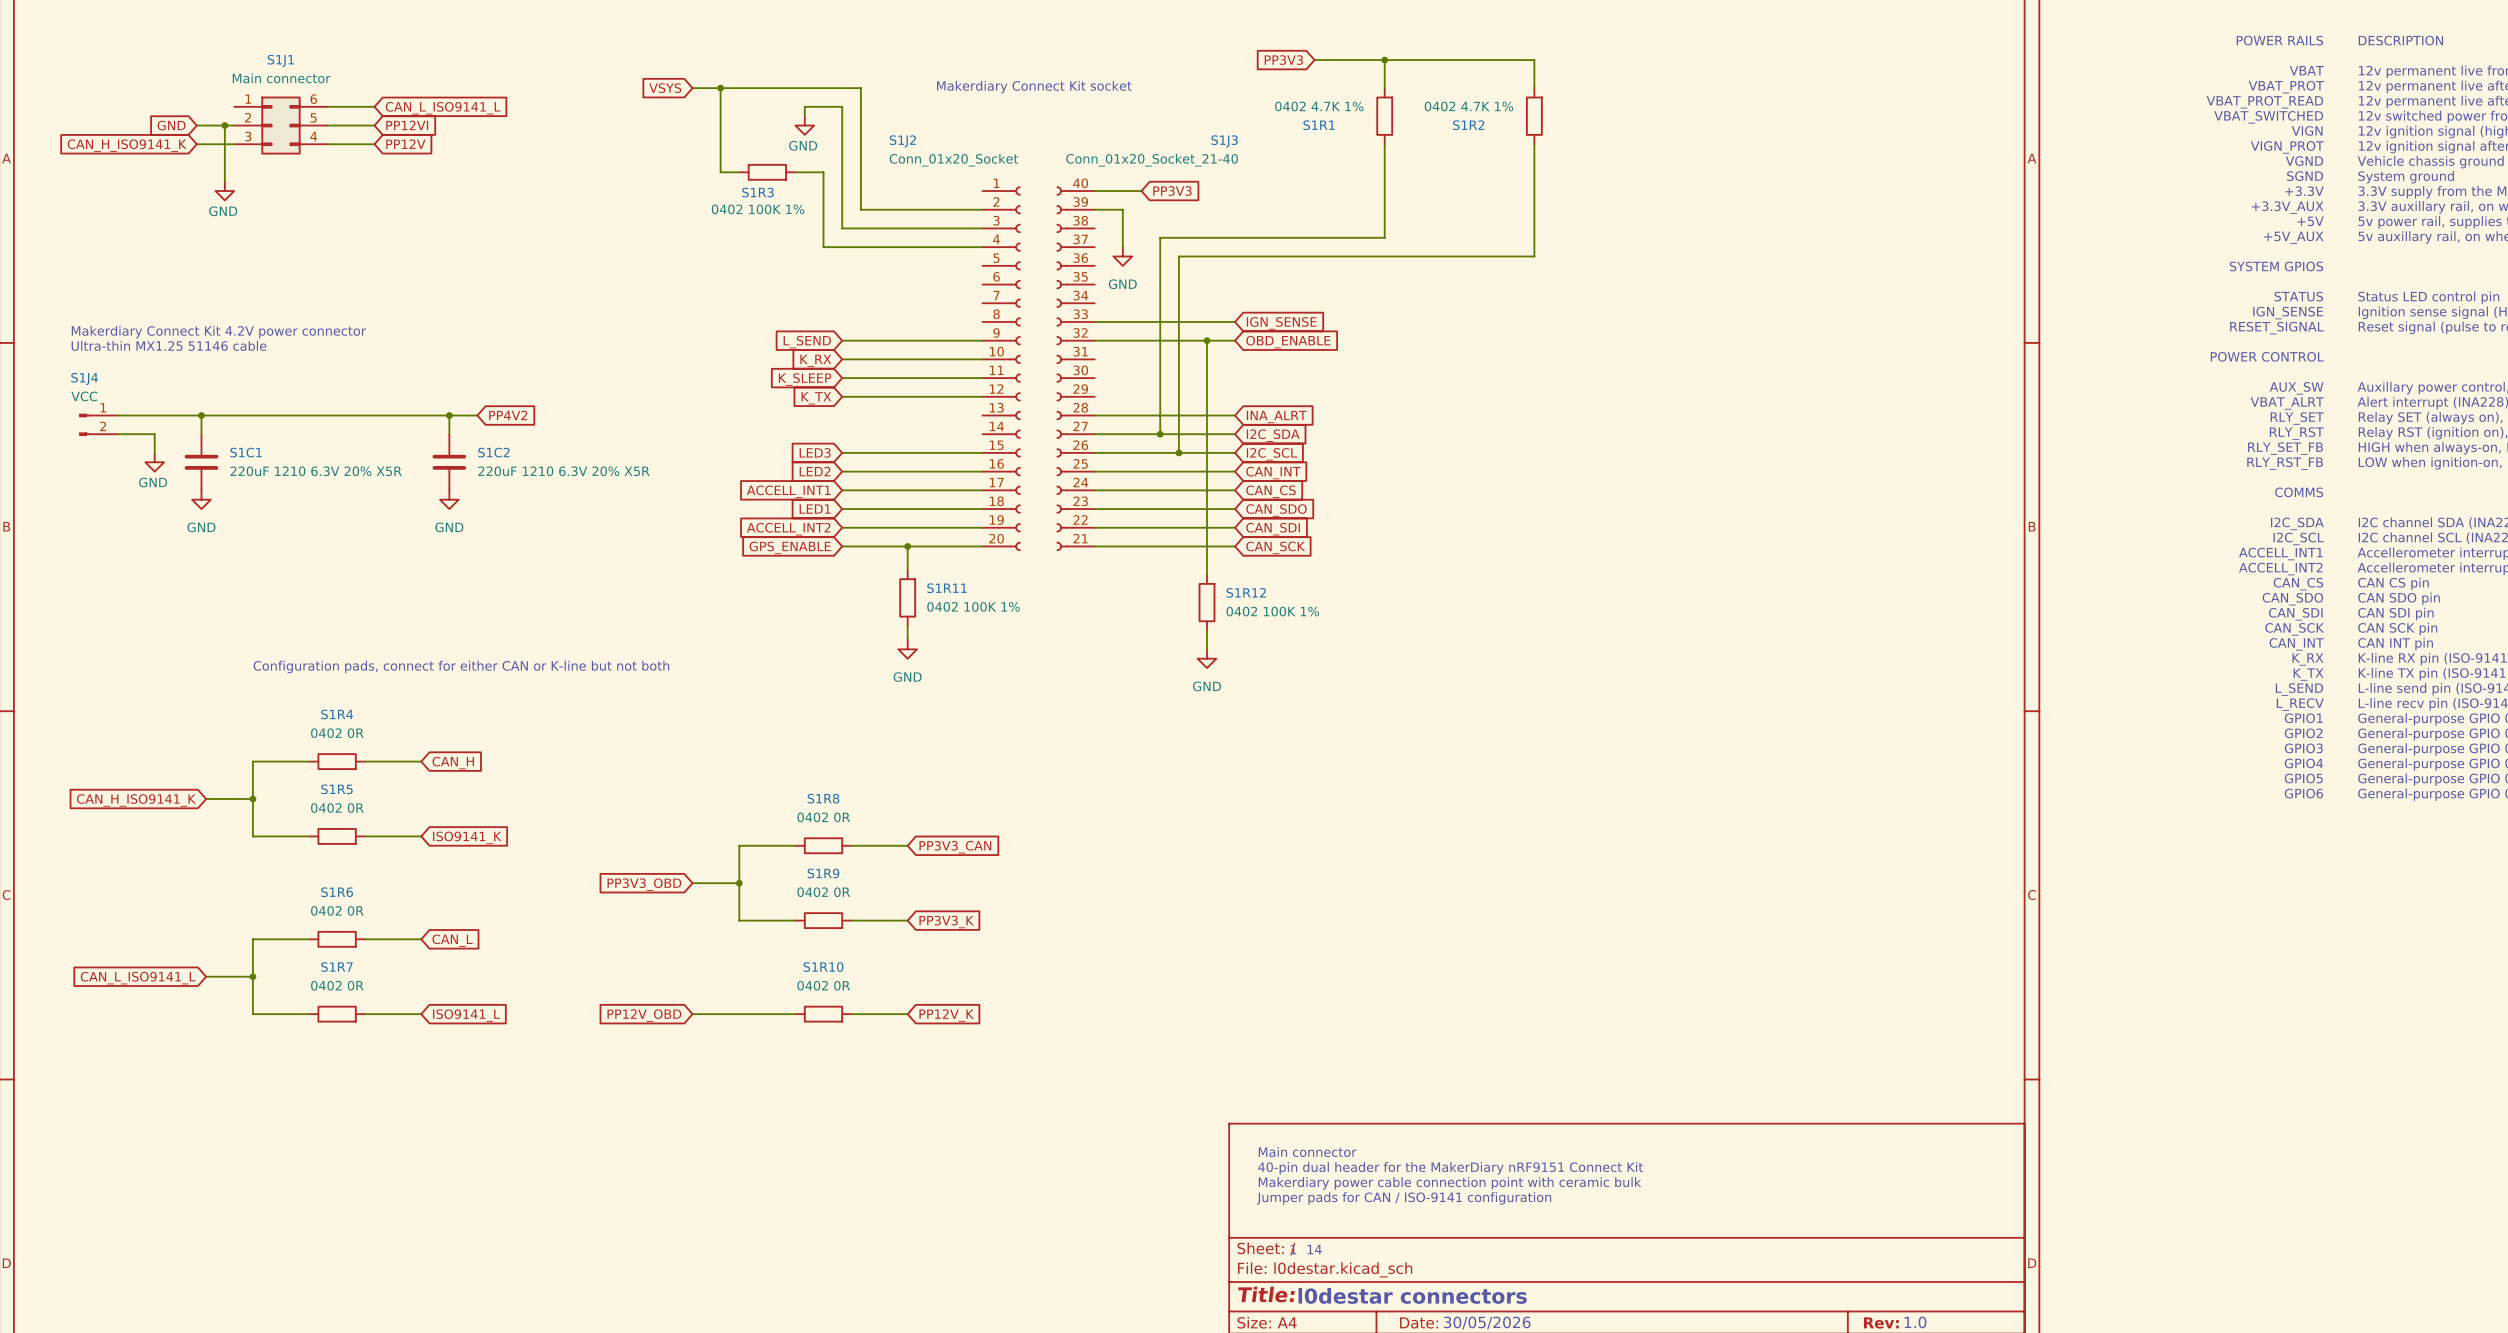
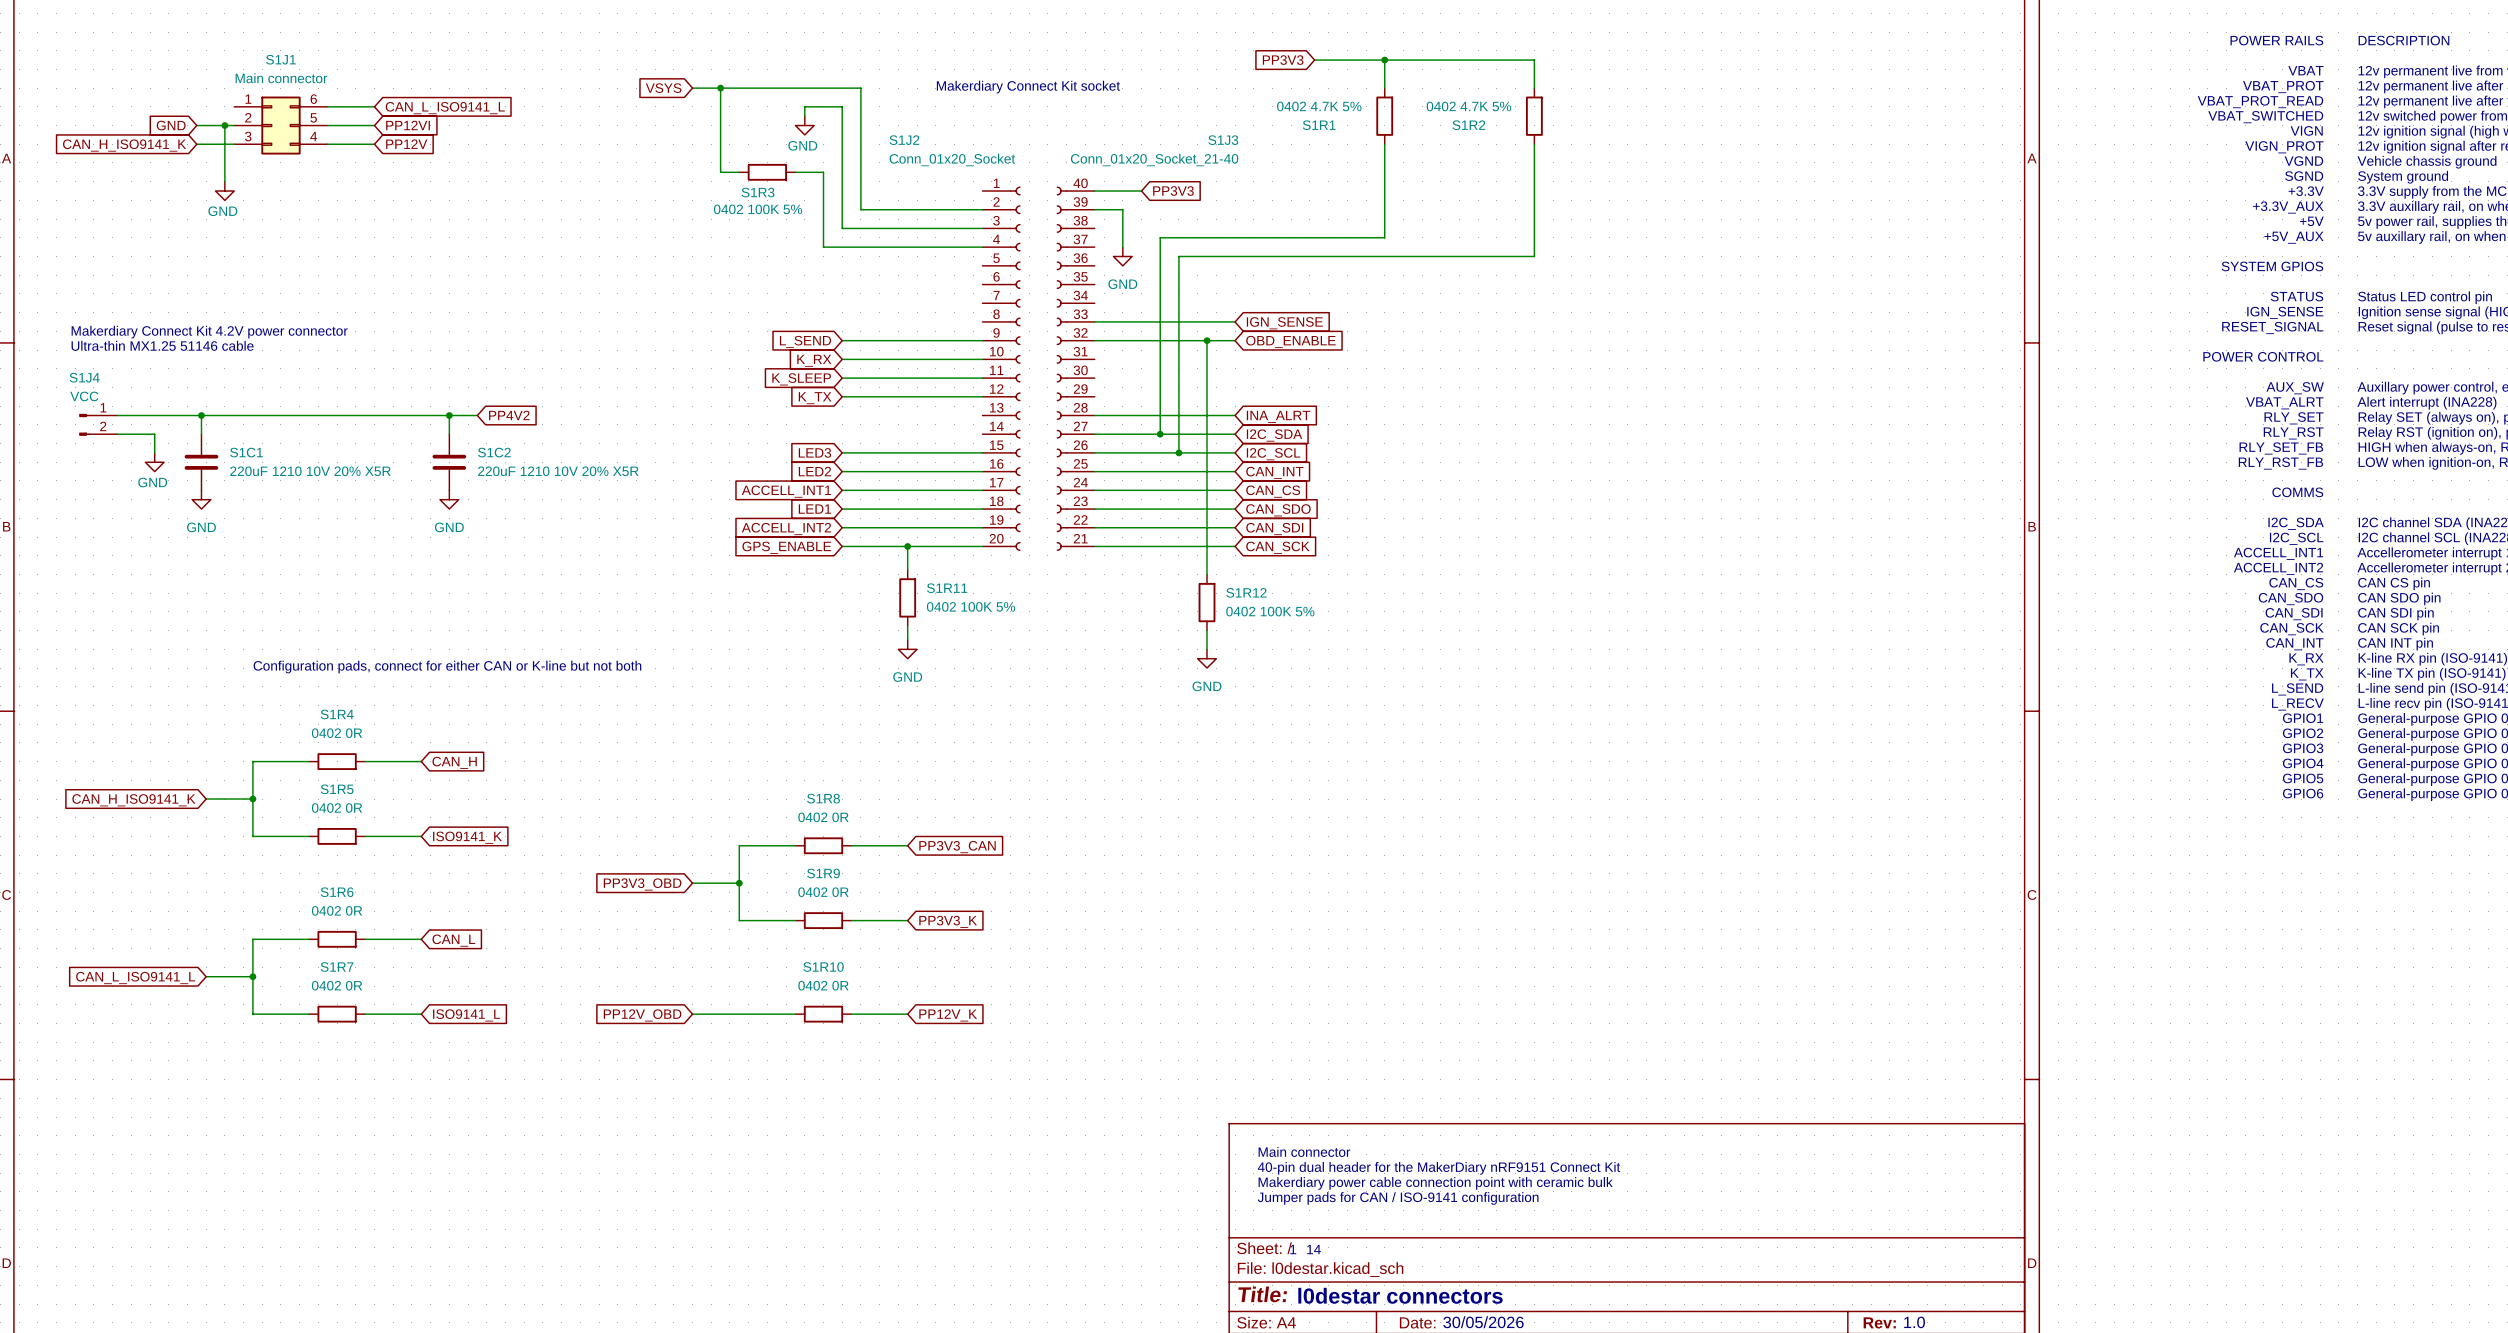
S1R1 value: 0402 4.7K 1% (1319, 106) -> 0402 4.7K 5% (1319, 106)
S1R2 value: 0402 4.7K 1% (1468, 106) -> 0402 4.7K 5% (1468, 106)
S1R3 value: 0402 100K 1% (758, 209) -> 0402 100K 5% (758, 209)
S1C1 value: 220uF 1210 6.3V 20% X5R (316, 471) -> 220uF 1210 10V 20% X5R (310, 471)
S1C2 value: 220uF 1210 6.3V 20% X5R (563, 471) -> 220uF 1210 10V 20% X5R (558, 471)
S1R11 value: 0402 100K 1% (973, 606) -> 0402 100K 5% (971, 606)
S1R12 value: 0402 100K 1% (1272, 611) -> 0402 100K 5% (1270, 611)

